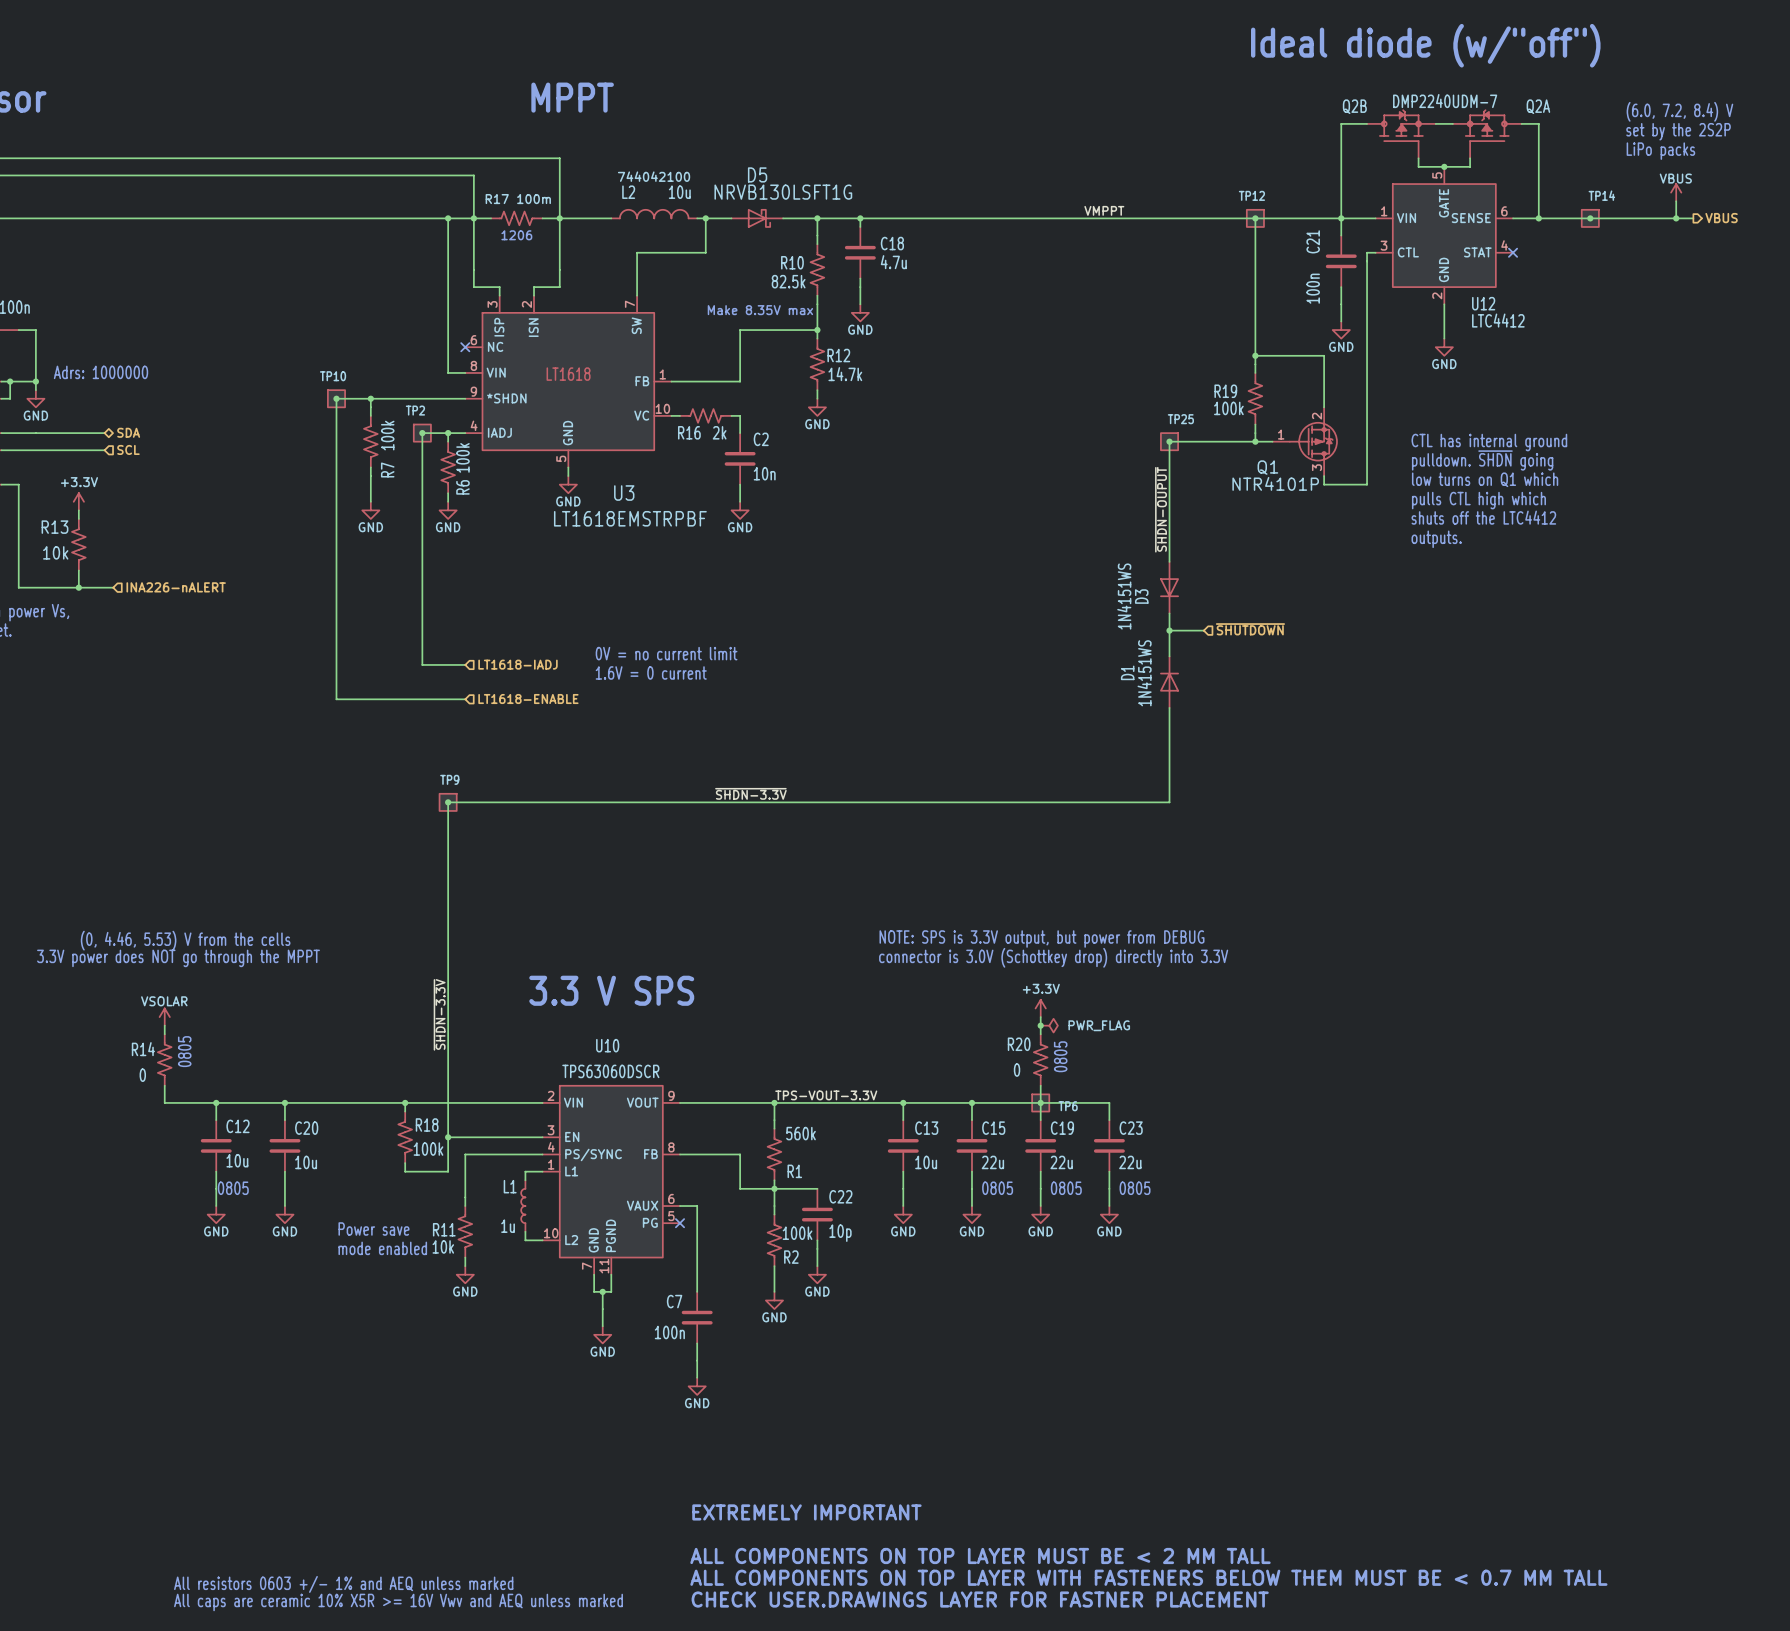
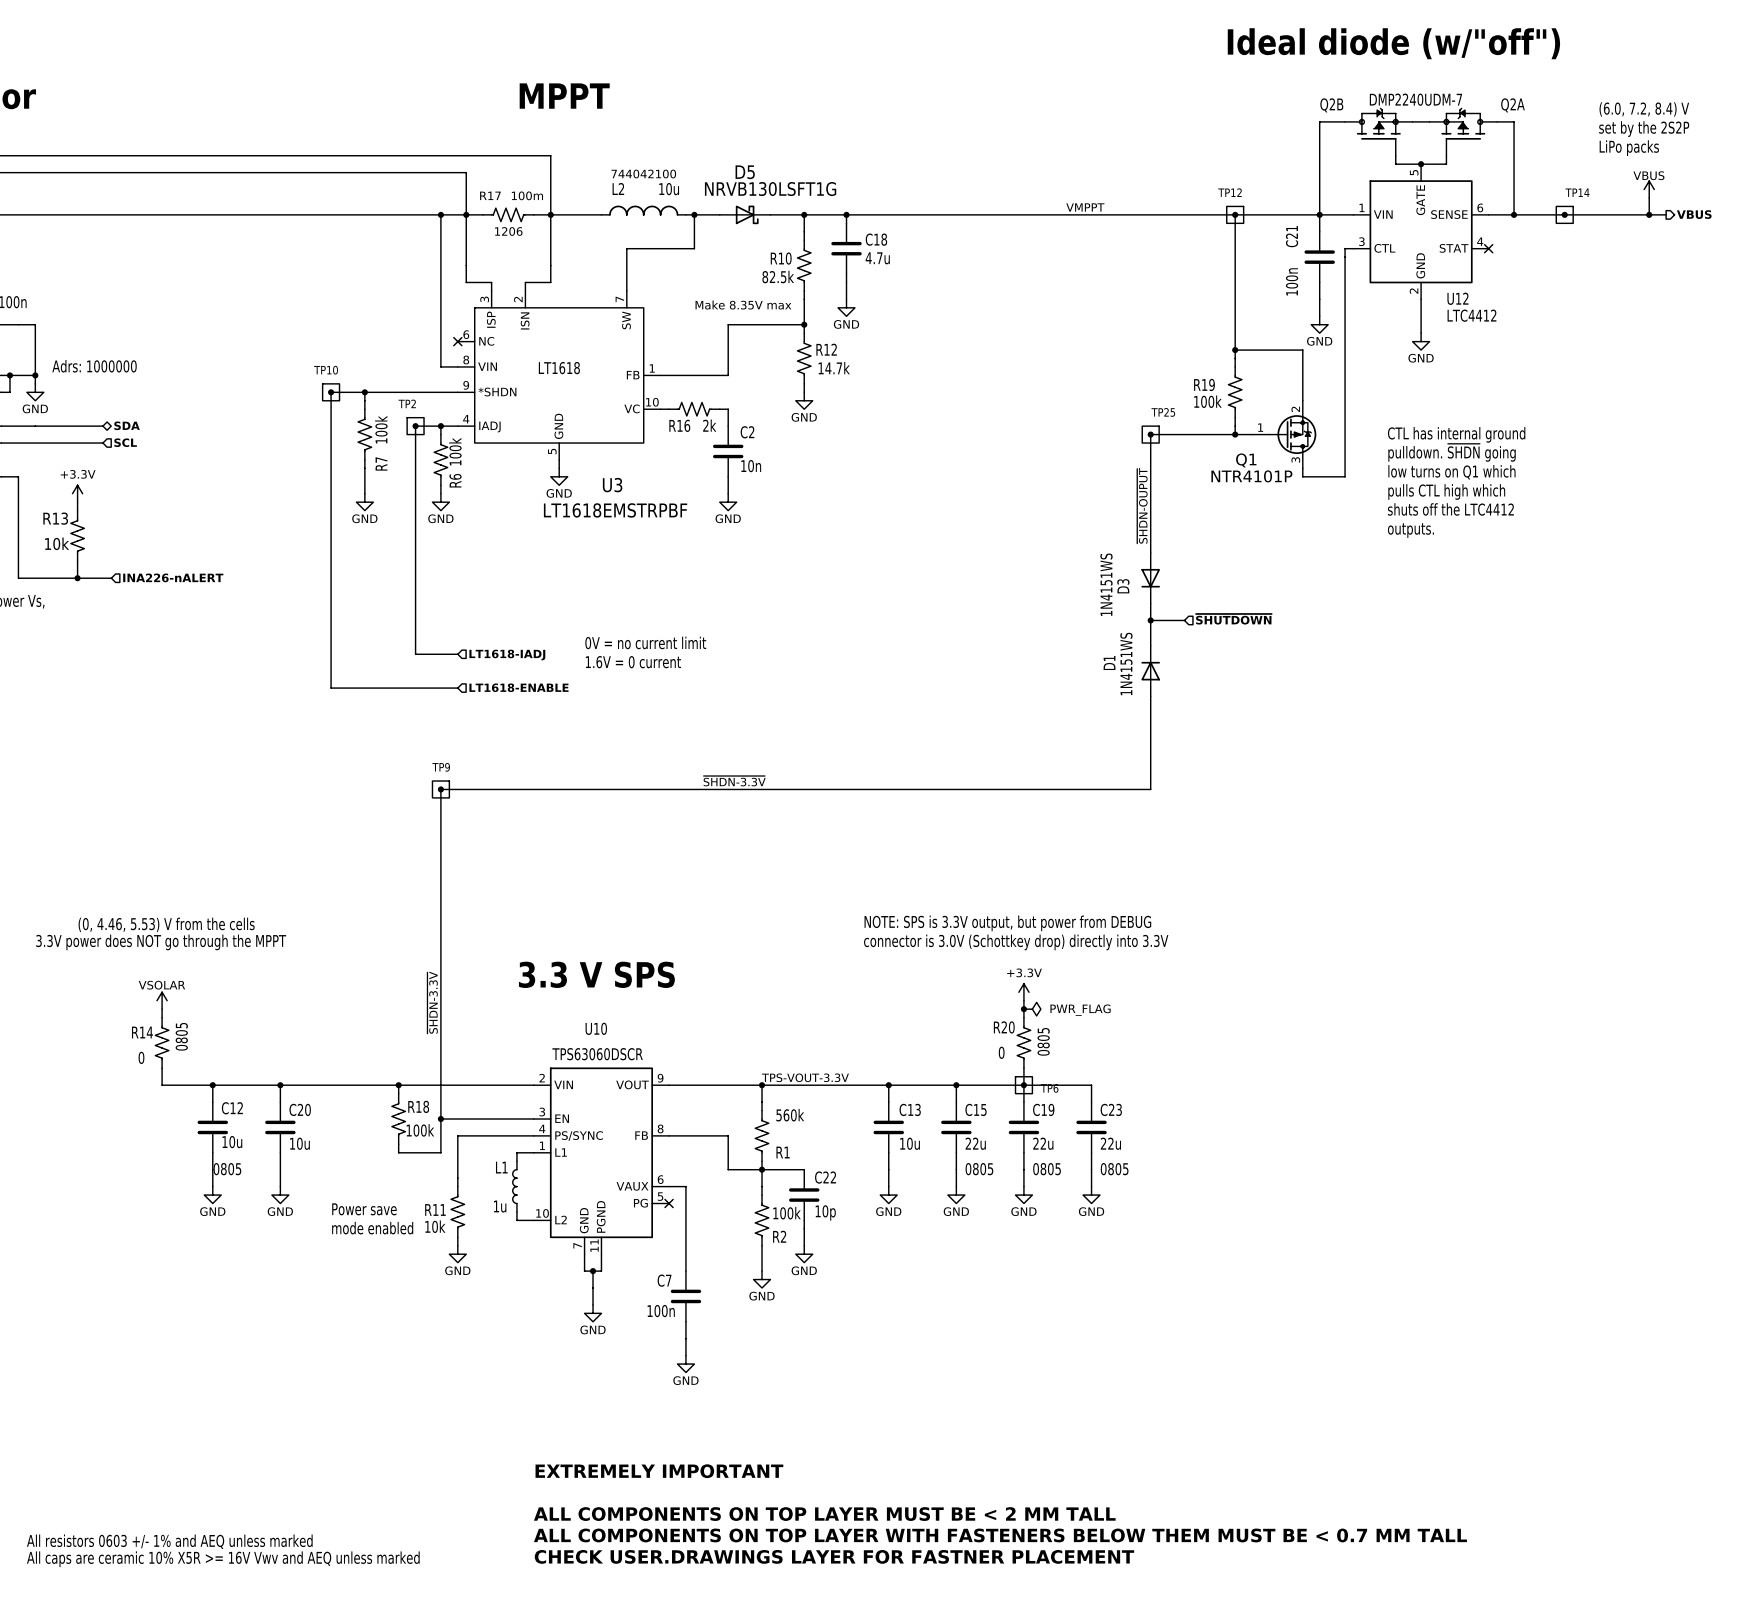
text position: EXTREMELY IMPORTANT (806, 1512) -> EXTREMELY IMPORTANT (659, 1471)
text position: ALL COMPONENTS ON TOP LAYER MUST BE < 2 MM TALL (980, 1555) -> ALL COMPONENTS ON TOP LAYER MUST BE < 2 MM TALL (824, 1514)
text position: ALL COMPONENTS ON TOP LAYER WITH FASTENERS BELOW THEM MUST BE < 0.7 MM TALL (1148, 1577) -> ALL COMPONENTS ON TOP LAYER WITH FASTENERS BELOW THEM MUST BE < 0.7 MM TALL (1000, 1535)
text position: All resistors 0603 +/- 1% and AEQ unless marked (343, 1584) -> All resistors 0603 +/- 1% and AEQ unless marked (169, 1541)
text position: CHECK USER.DRAWINGS LAYER FOR FASTNER PLACEMENT (980, 1599) -> CHECK USER.DRAWINGS LAYER FOR FASTNER PLACEMENT (834, 1556)
text position: All caps are ceramic 10% X5R >= 16V Vwv and AEQ unless marked (398, 1602) -> All caps are ceramic 10% X5R >= 16V Vwv and AEQ unless marked (223, 1559)

